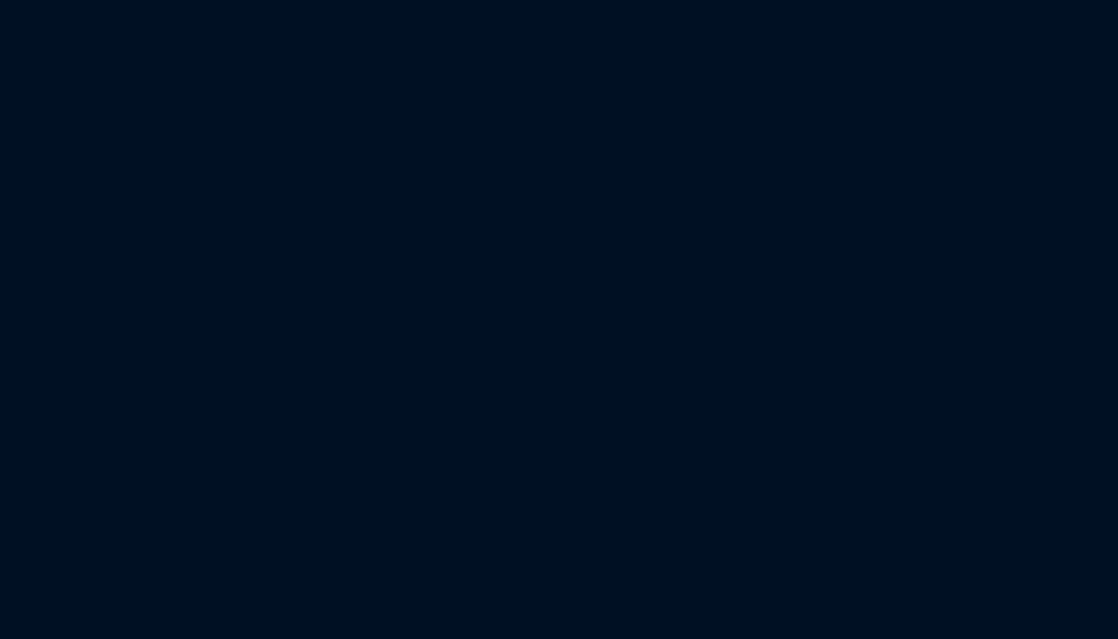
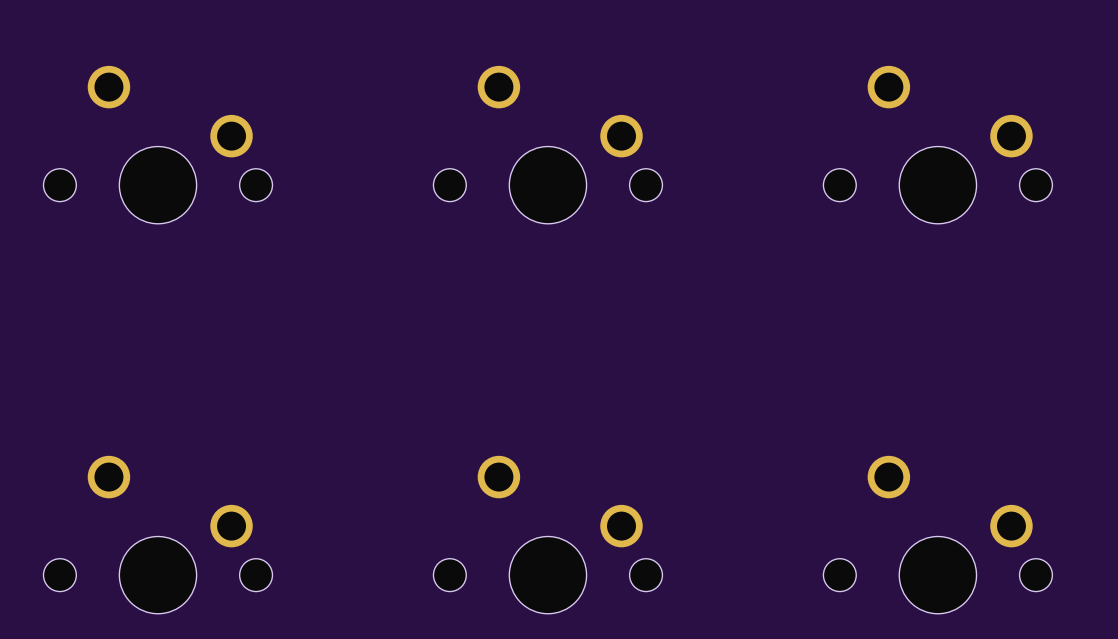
part: none -> (157, 144)
part: none -> (547, 144)
part: none -> (937, 144)
part: none -> (157, 534)
part: none -> (547, 534)
part: none -> (937, 534)

